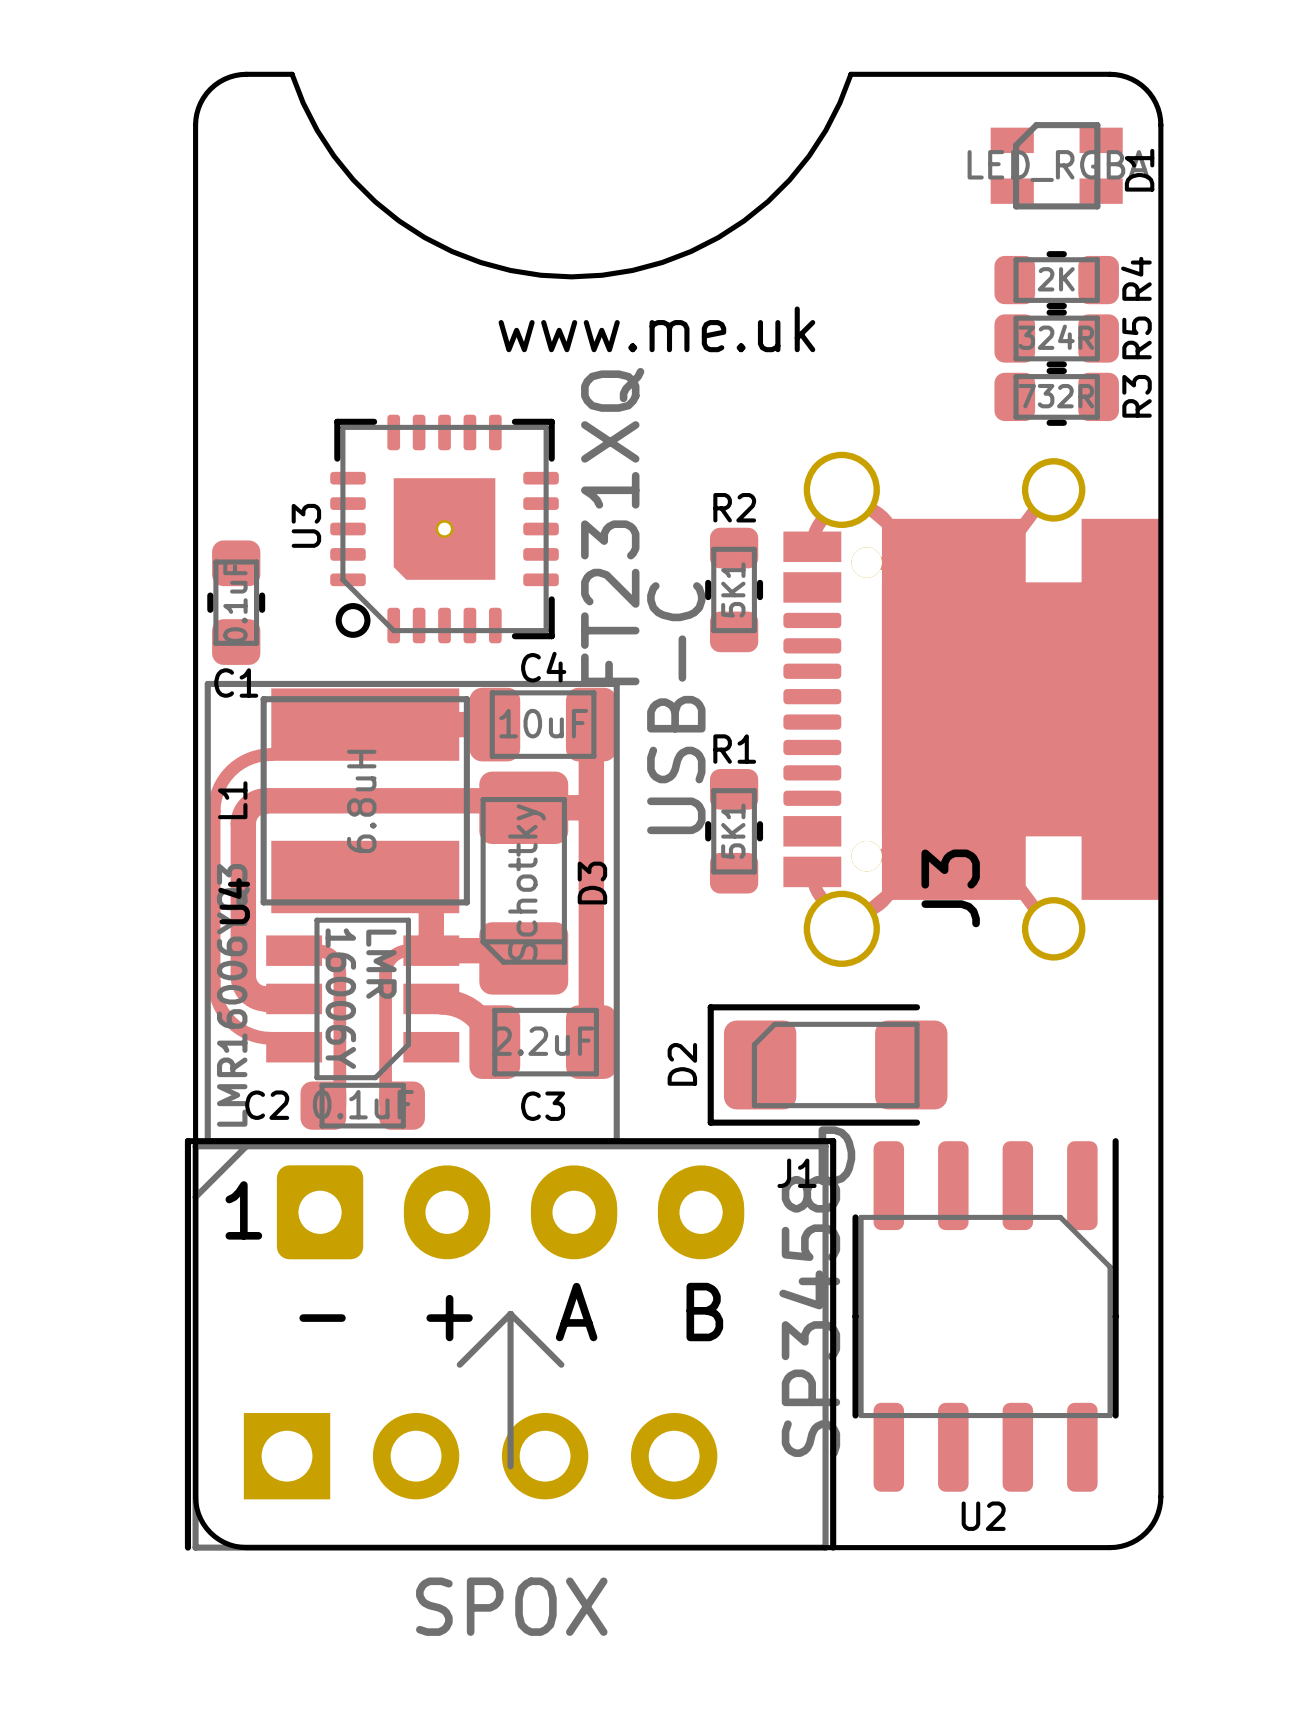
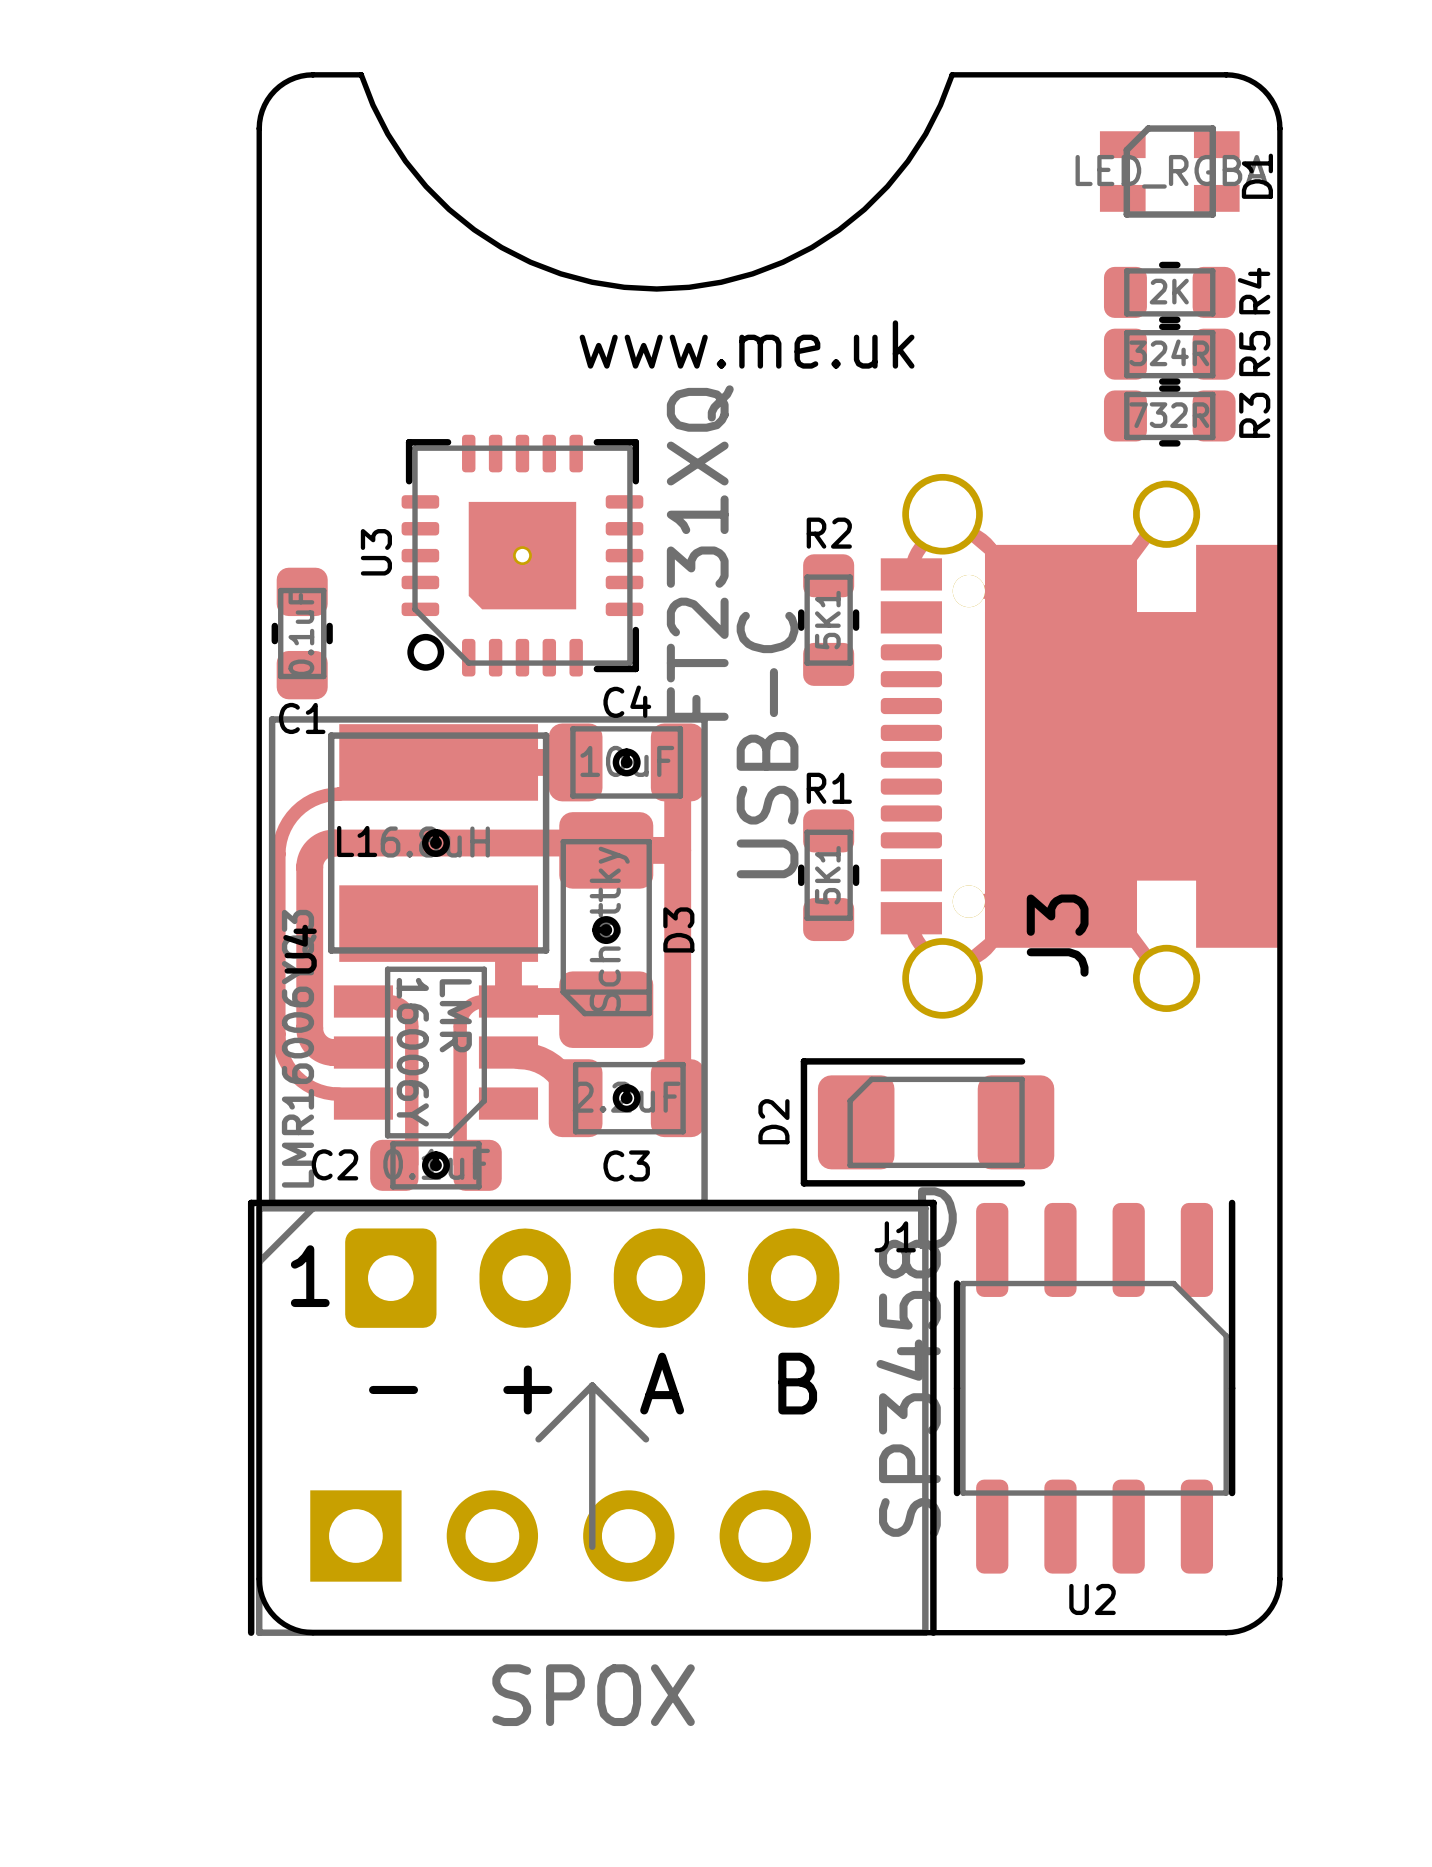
C4 footprint: [499, 651, 589, 739] -> [612, 748, 641, 777]
U4 footprint: [204, 680, 620, 1145] -> [268, 716, 708, 1207]
L1 footprint: [218, 749, 377, 854] -> [422, 829, 450, 857]
D3 footprint: [508, 804, 608, 961] -> [592, 916, 621, 945]
C3 footprint: [492, 1026, 595, 1121] -> [612, 1084, 641, 1113]
C2 footprint: [245, 1089, 414, 1120] -> [422, 1151, 450, 1180]

